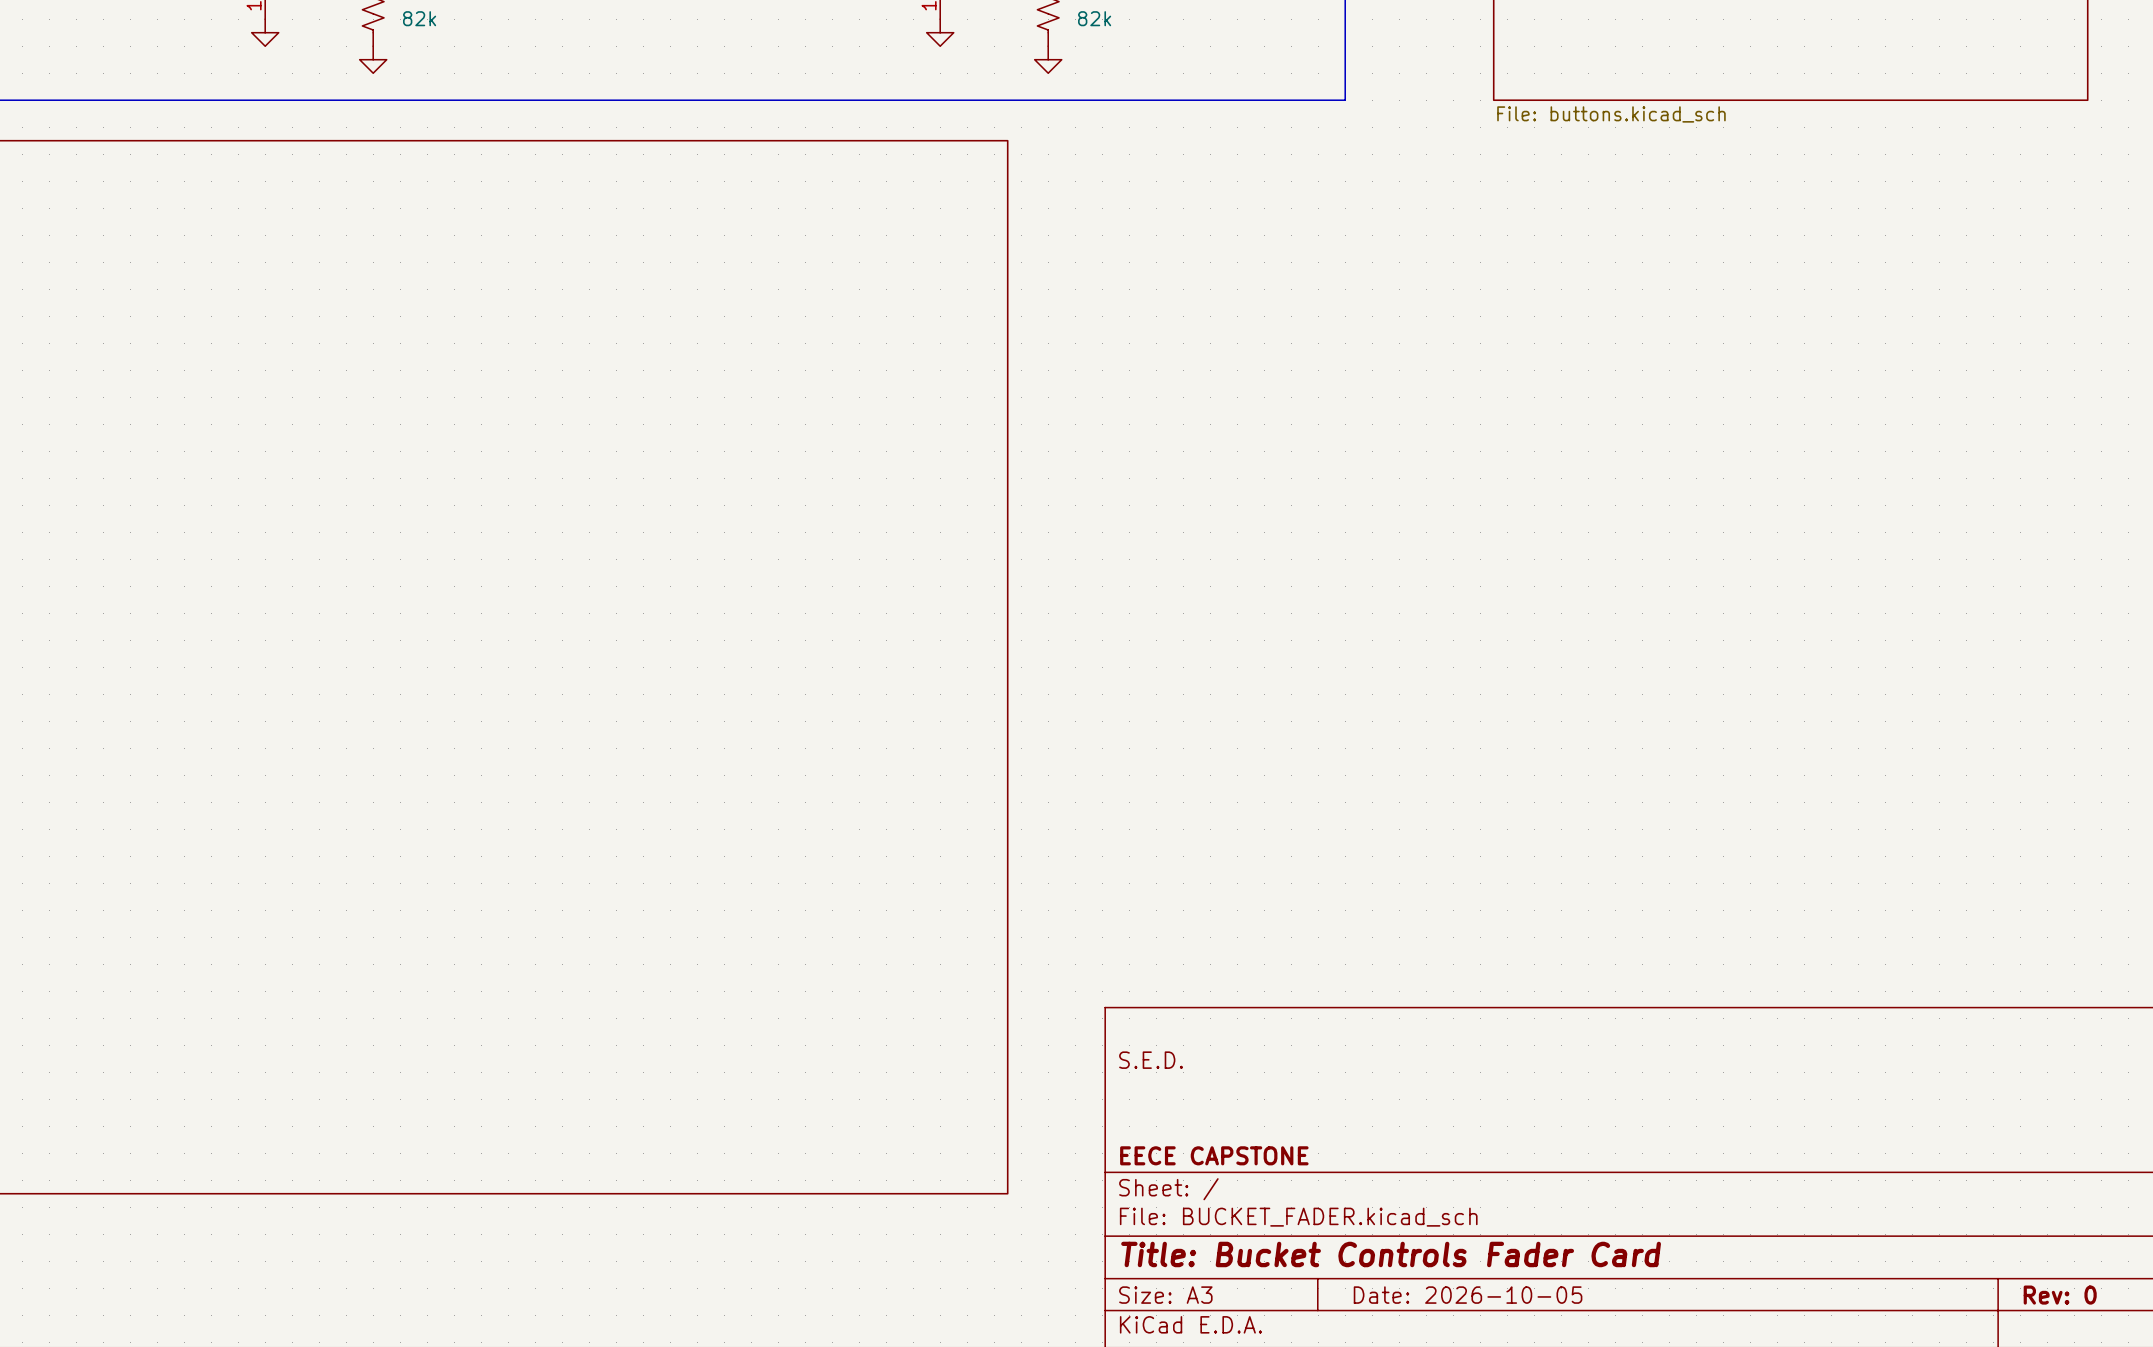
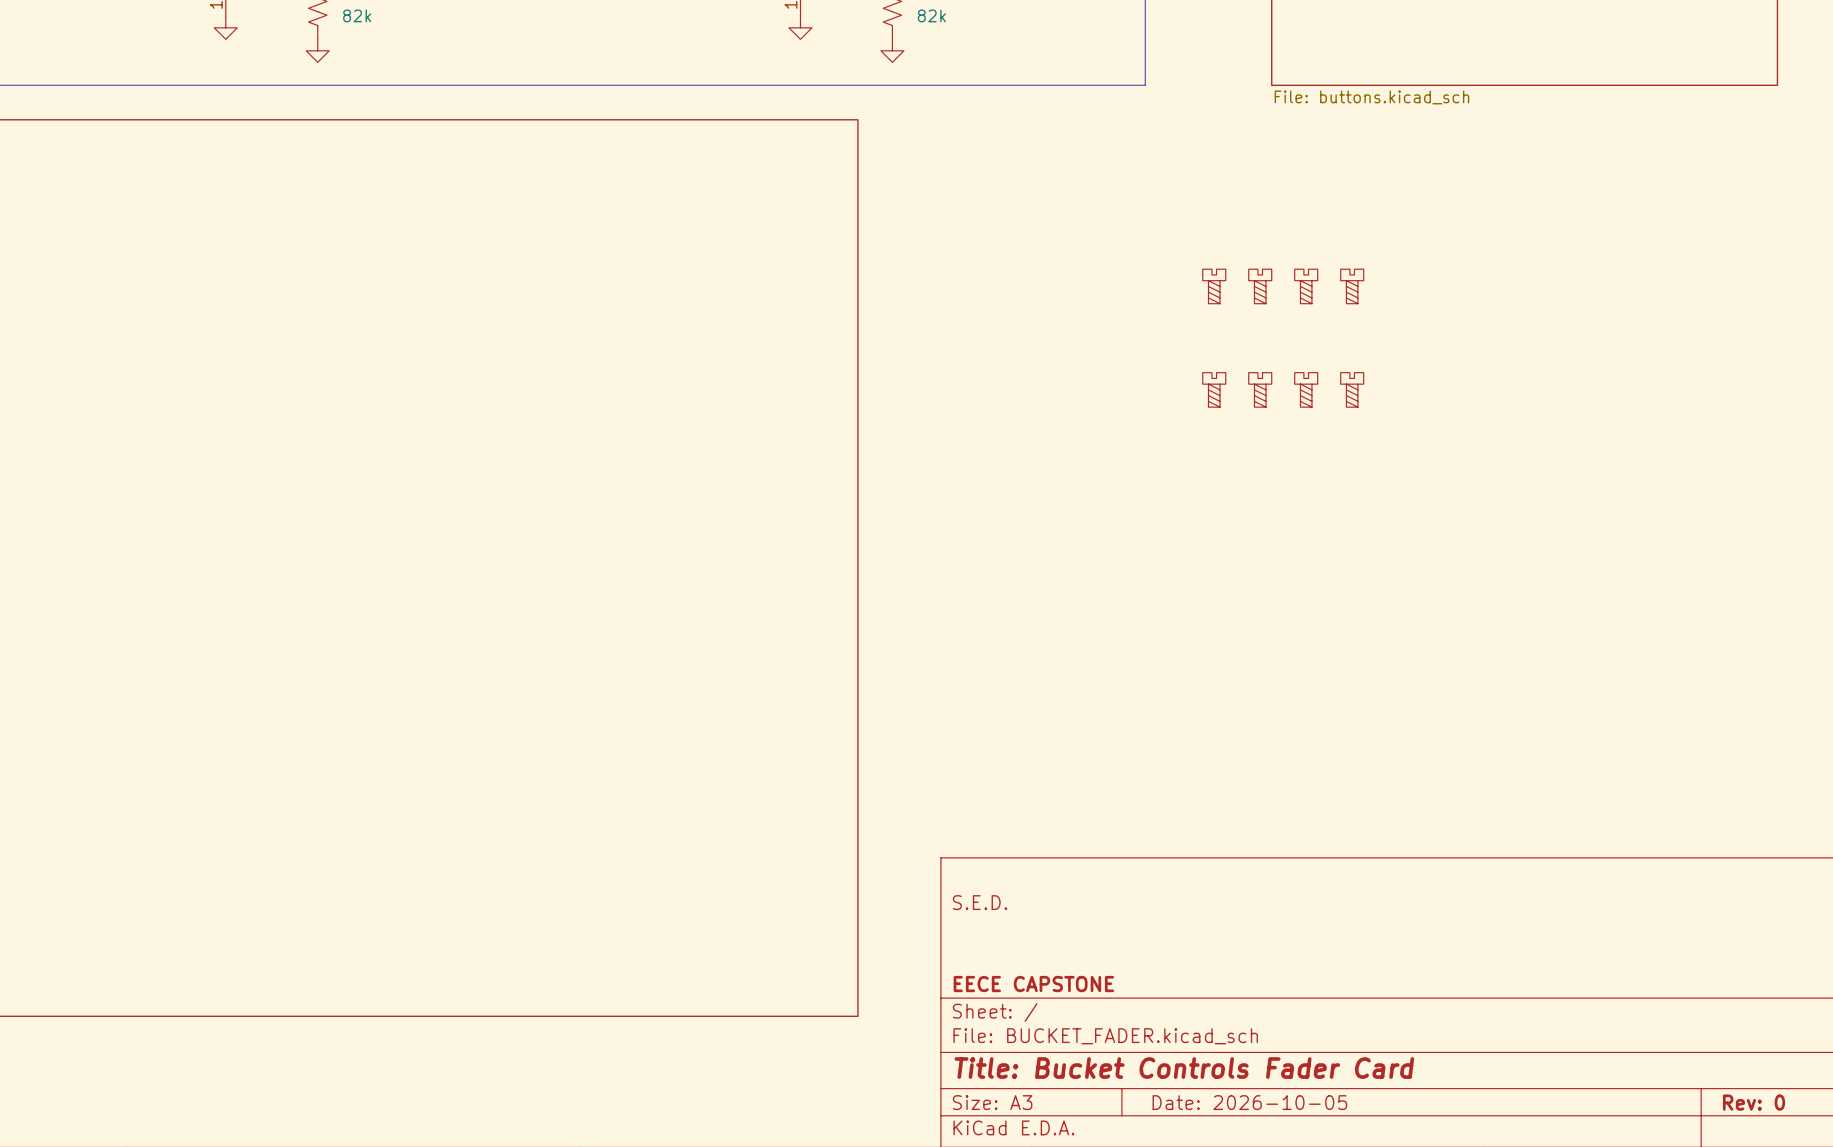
part: none -> (1214, 286)
part: none -> (1260, 286)
part: none -> (1306, 286)
part: none -> (1352, 286)
part: none -> (1214, 389)
part: none -> (1260, 389)
part: none -> (1306, 389)
part: none -> (1352, 389)

